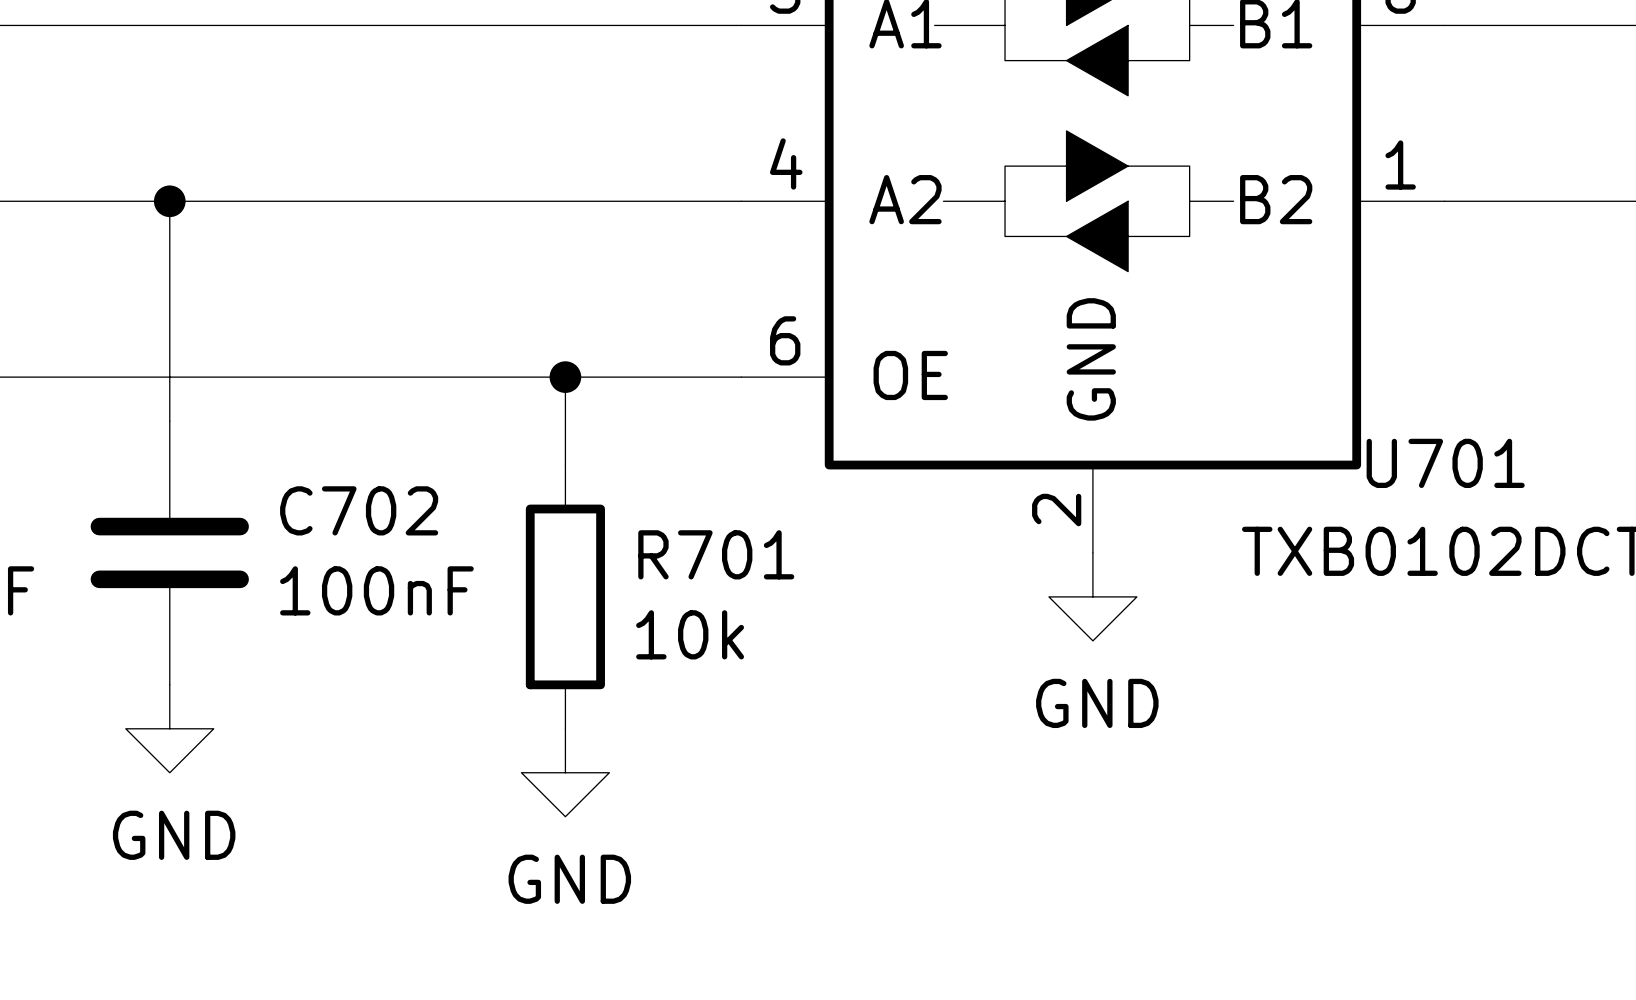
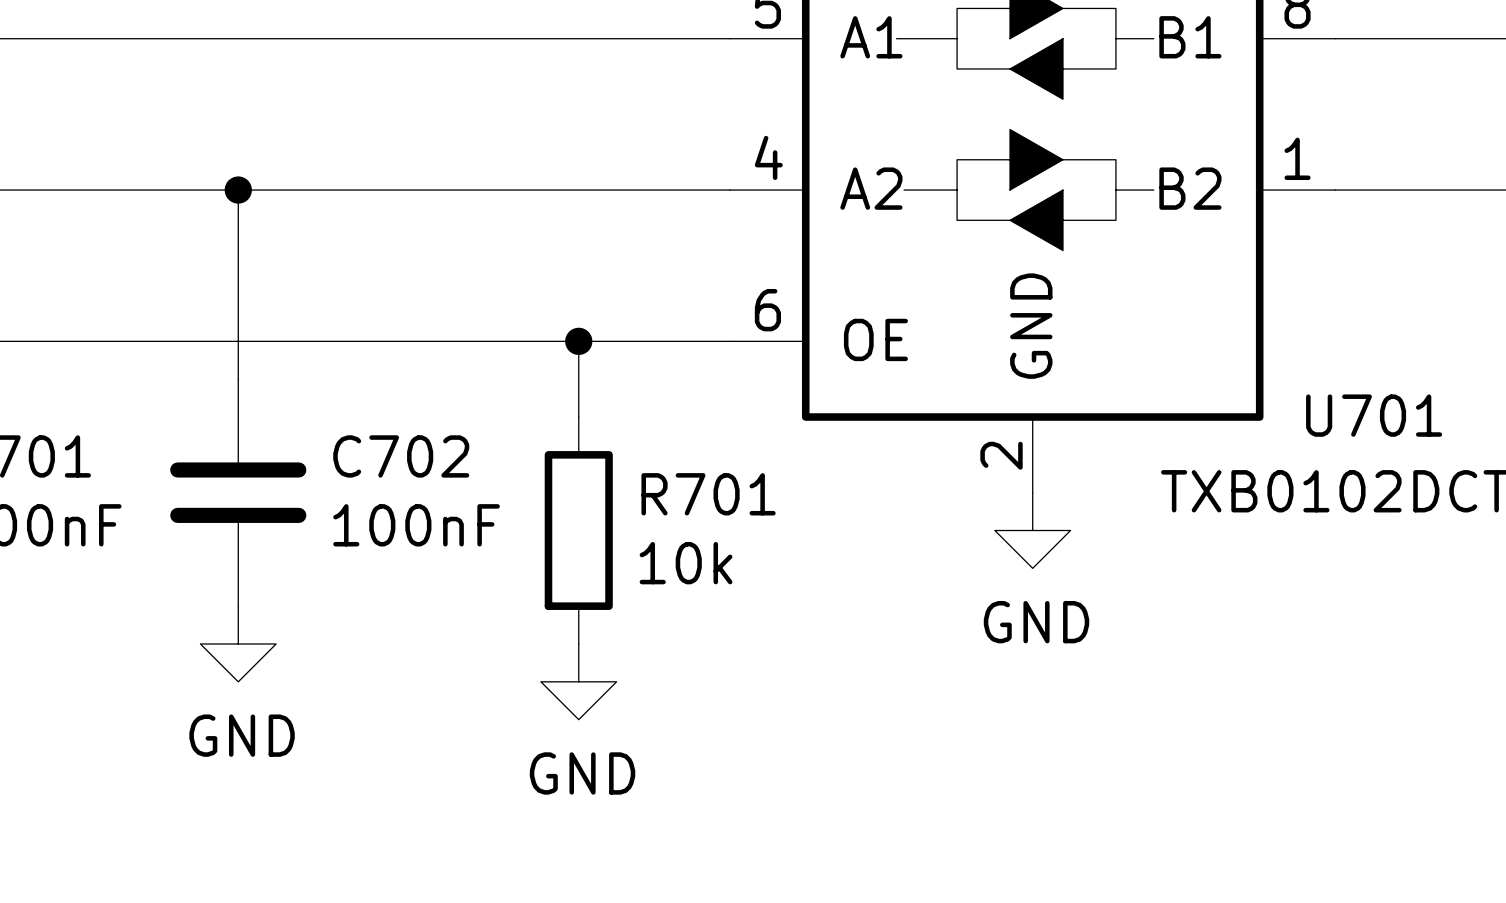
U701 name position: U701 (1445, 463) -> U701 (1374, 415)

